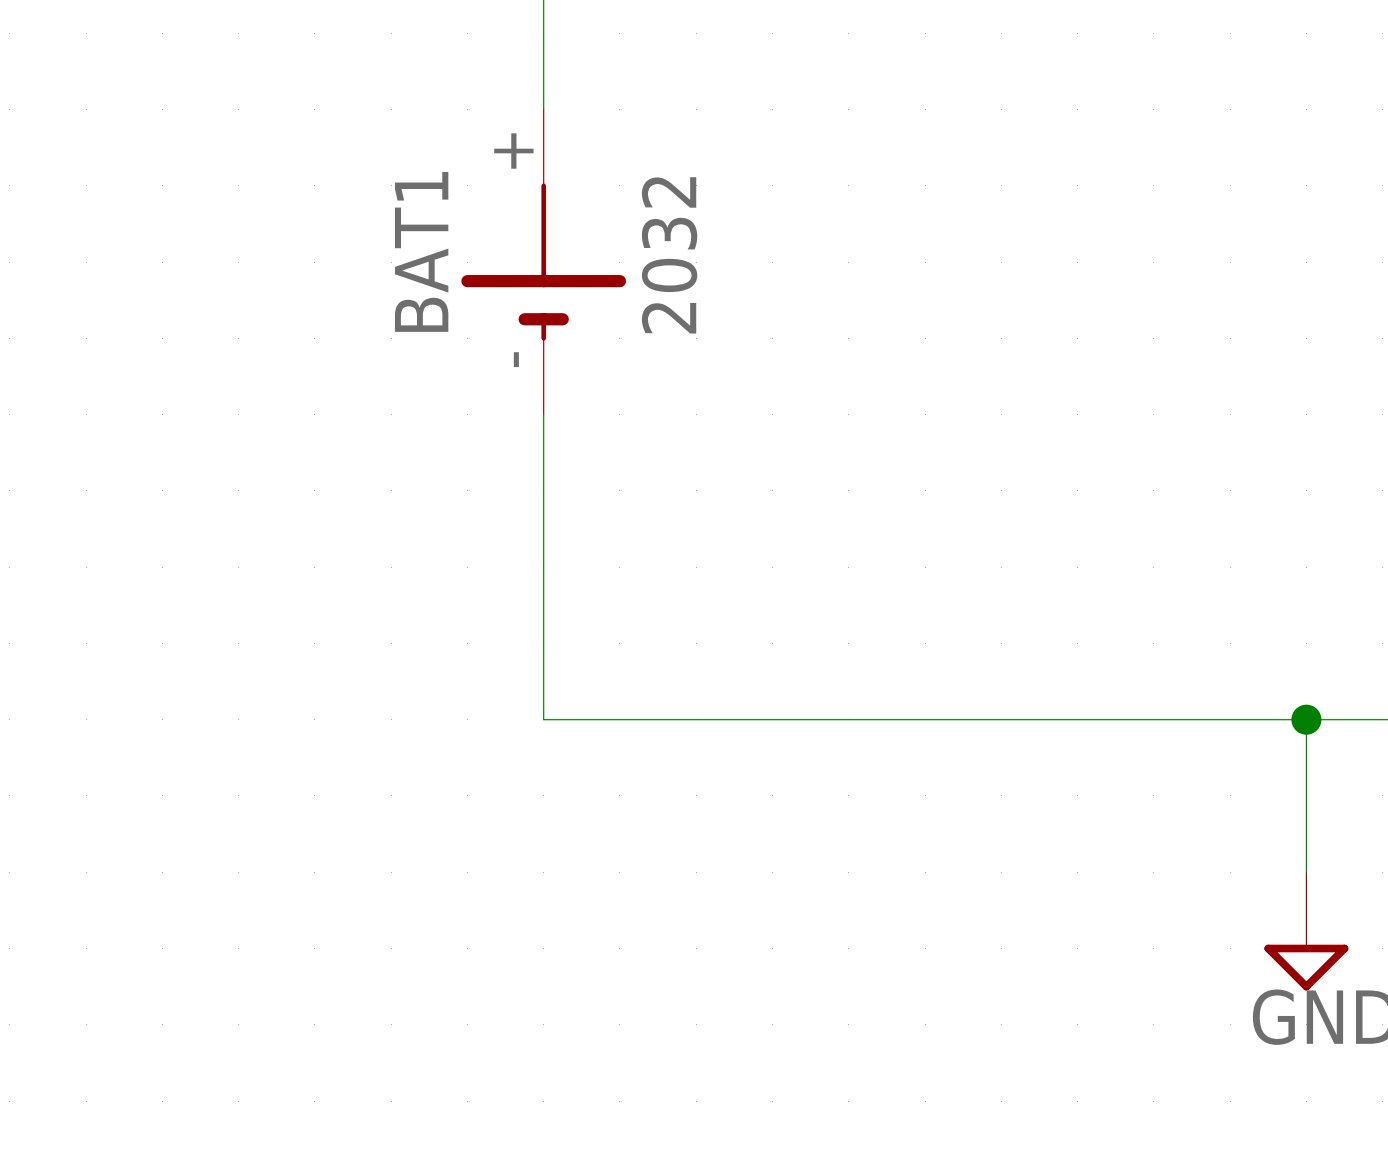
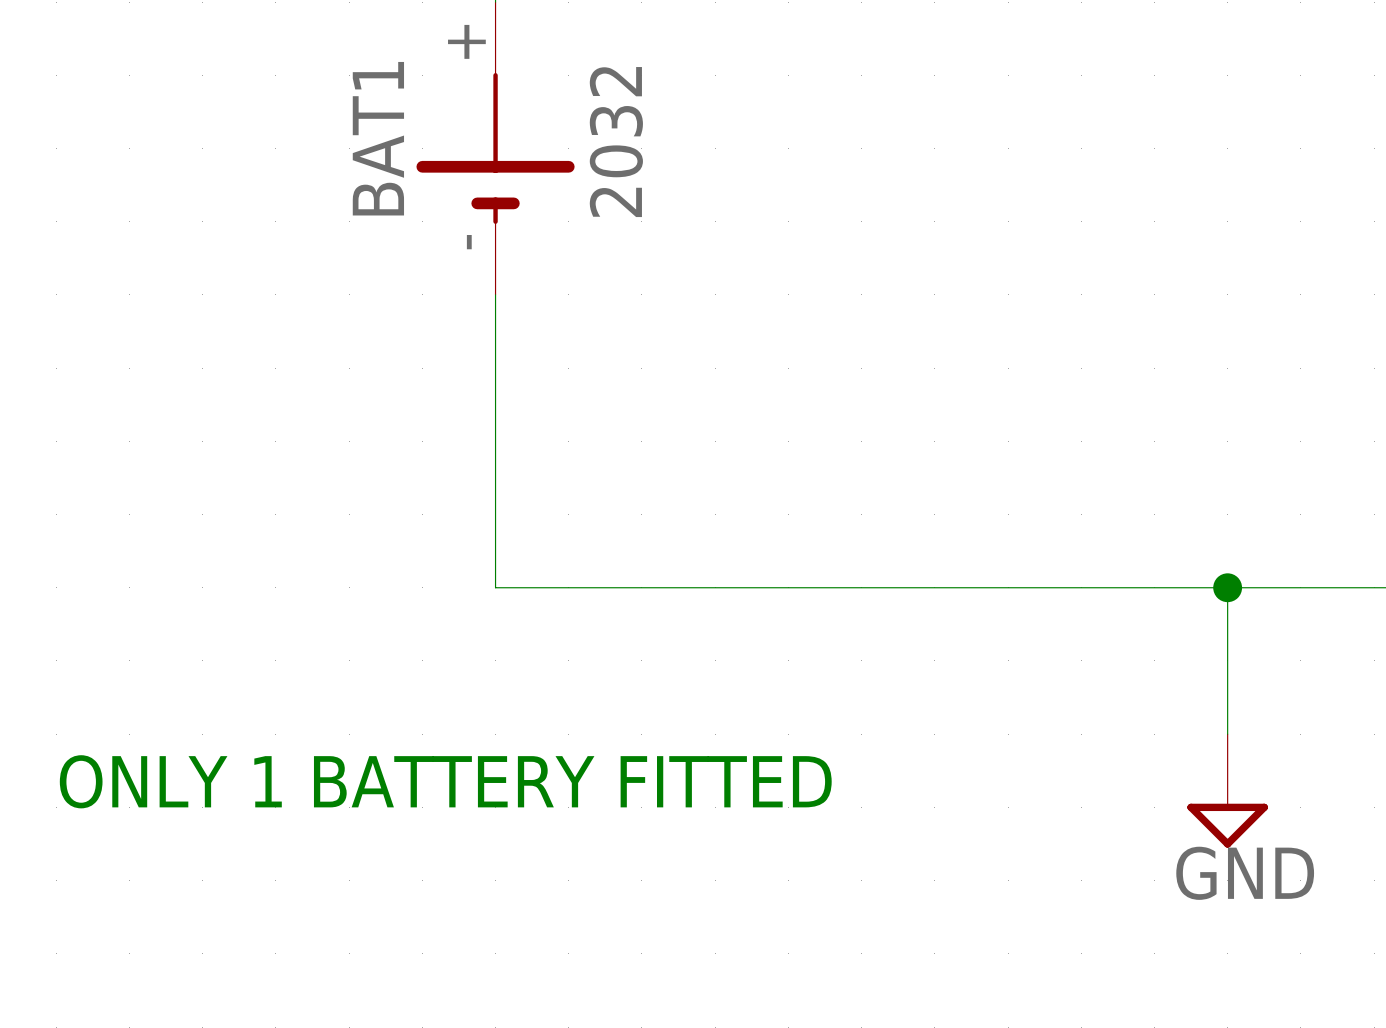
text: none -> ONLY 1 BATTERY FITTED (445, 781)

